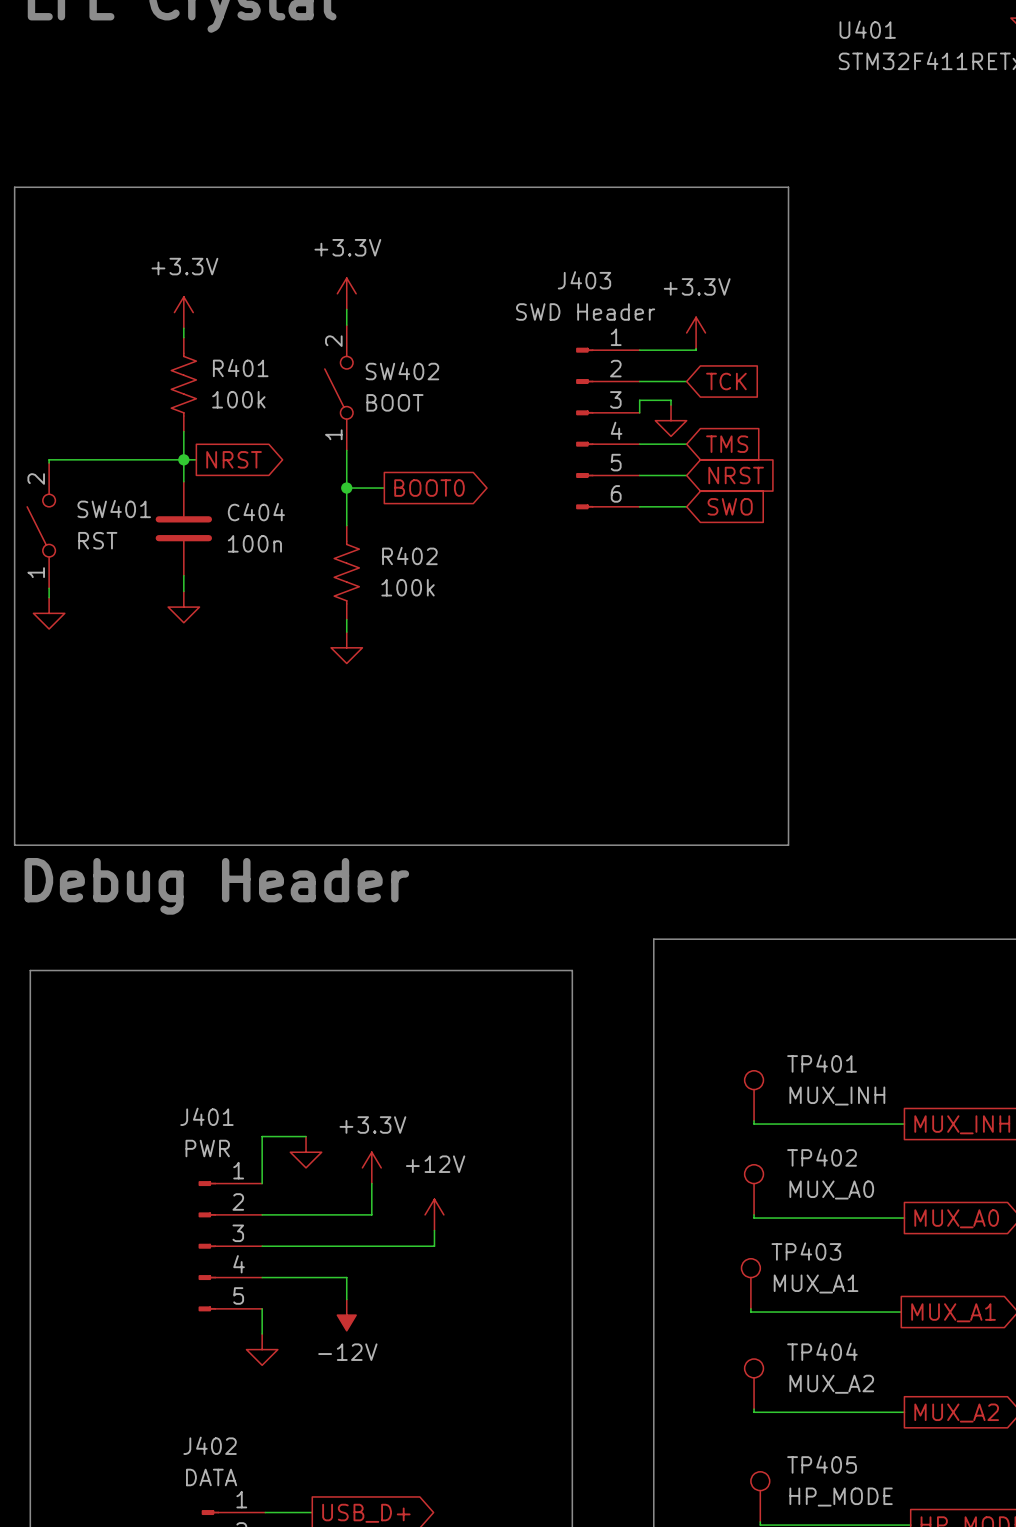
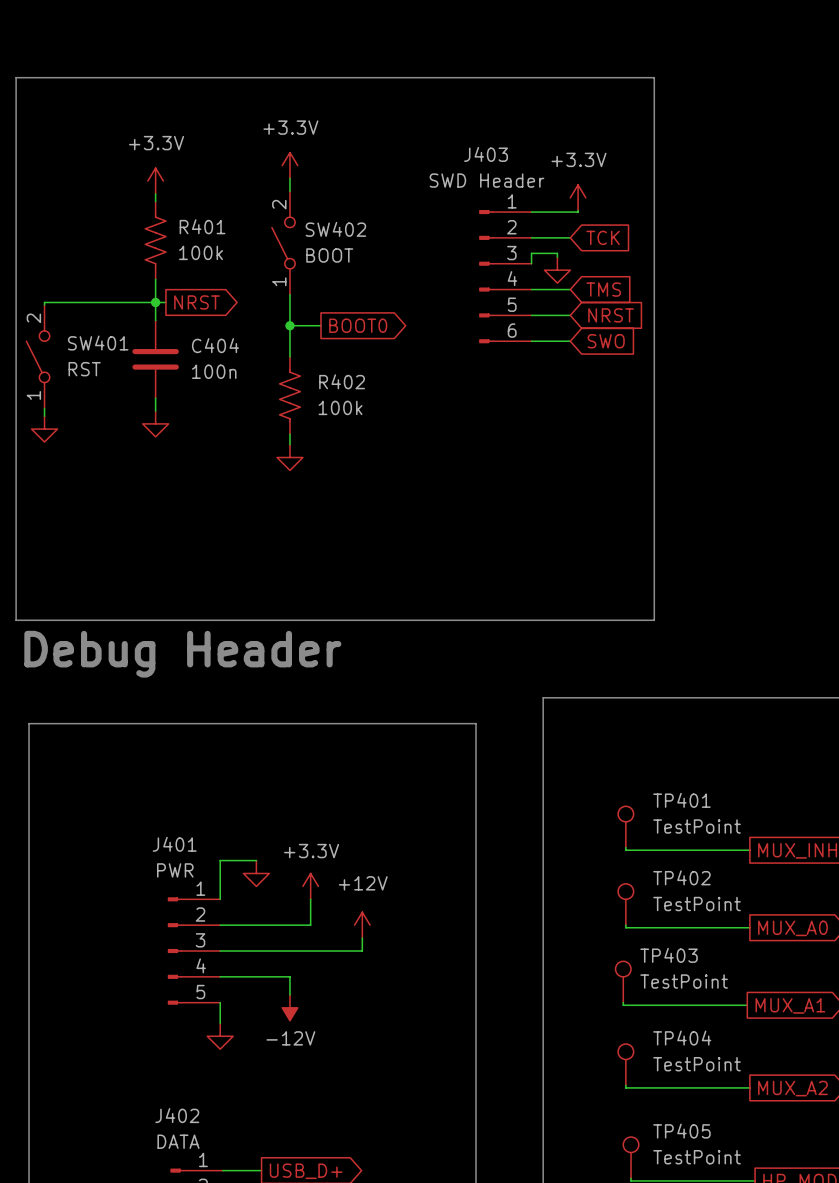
TP401 value: MUX_INH (837, 1096) -> TestPoint (697, 826)
TP402 value: MUX_A0 (831, 1189) -> TestPoint (697, 904)
TP403 value: MUX_A1 (816, 1283) -> TestPoint (684, 981)
TP404 value: MUX_A2 (831, 1384) -> TestPoint (697, 1064)
TP405 value: HP_MODE (841, 1497) -> TestPoint (697, 1157)

